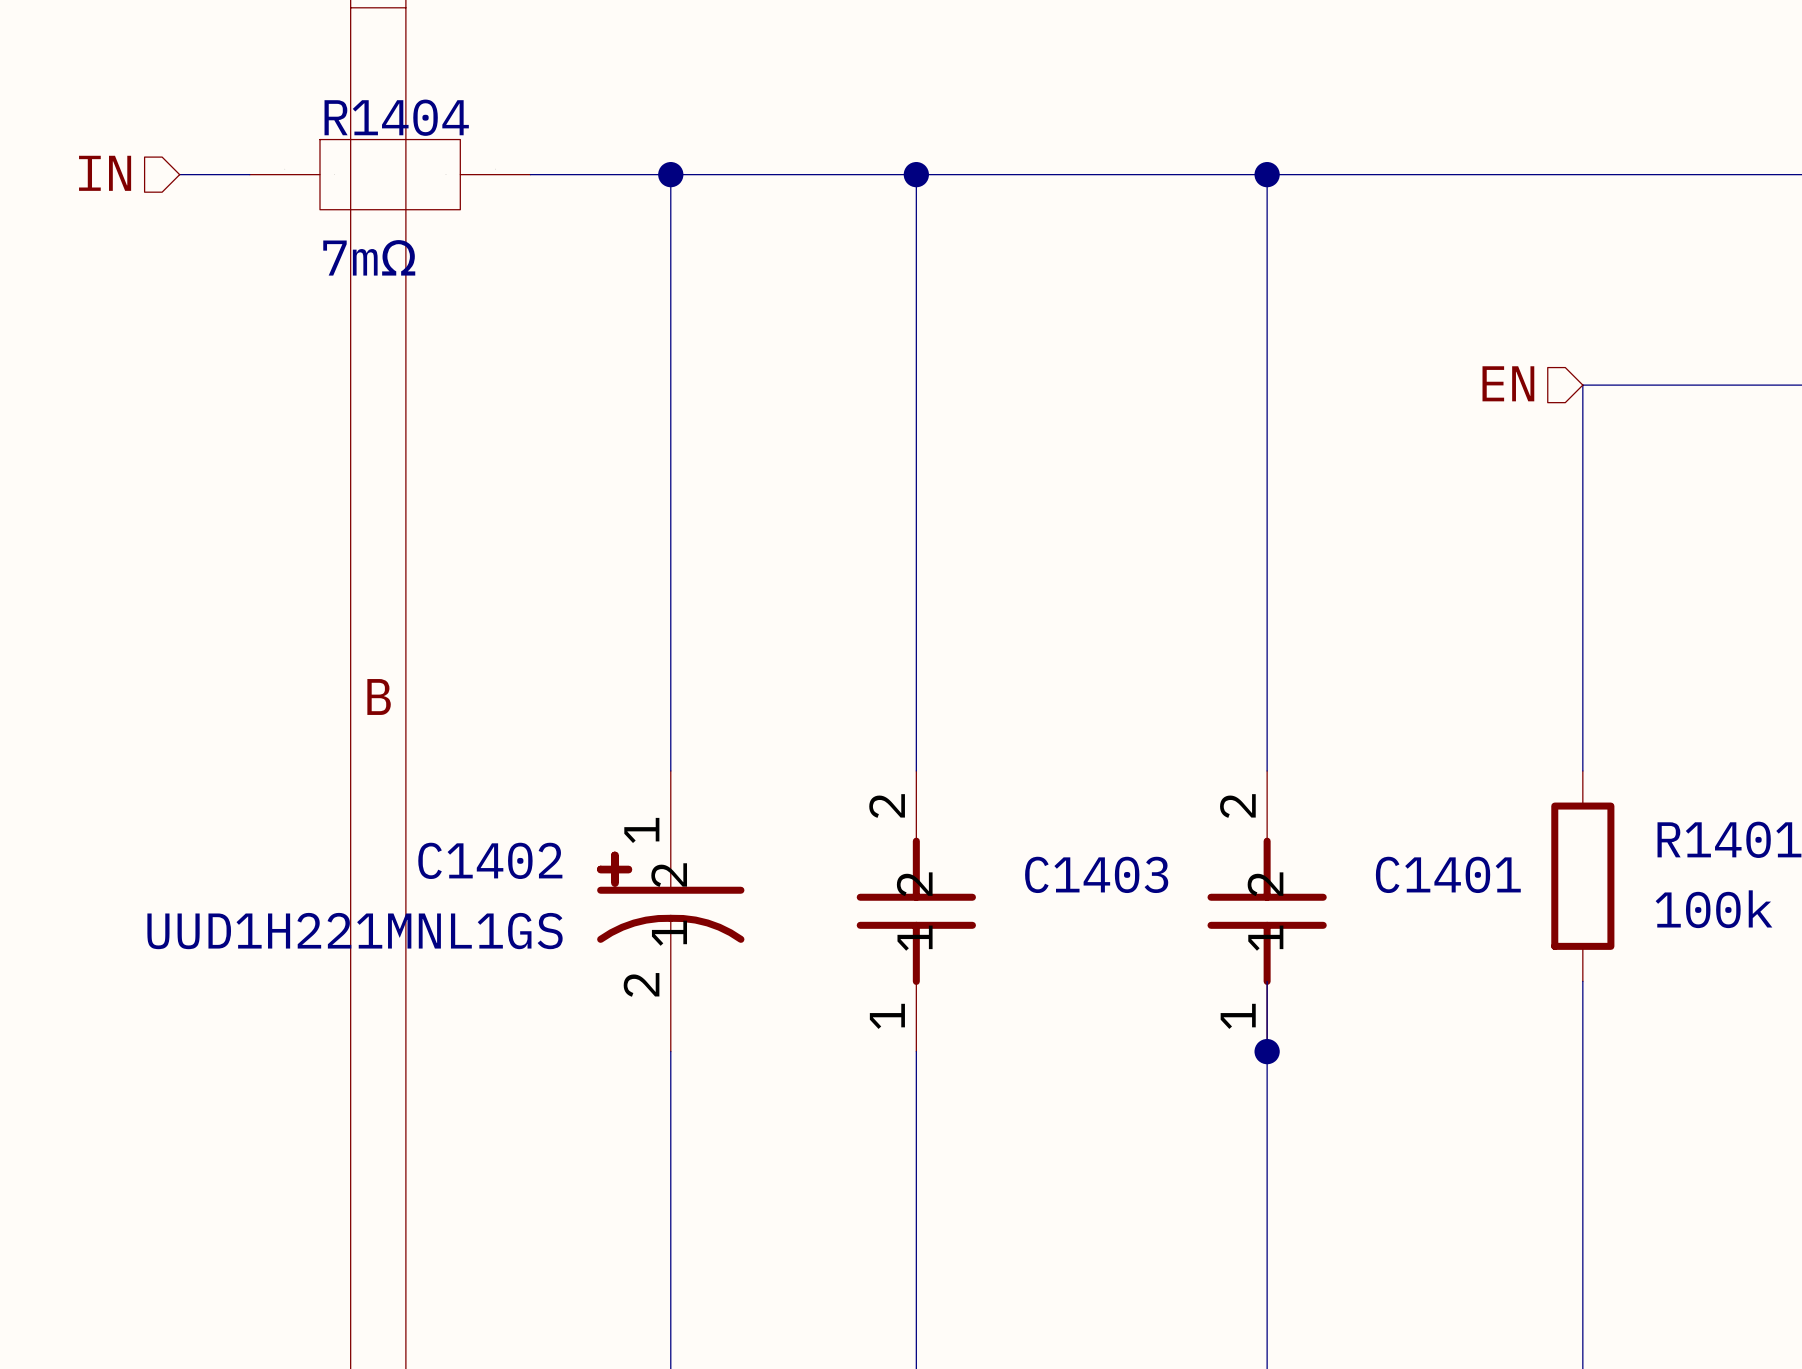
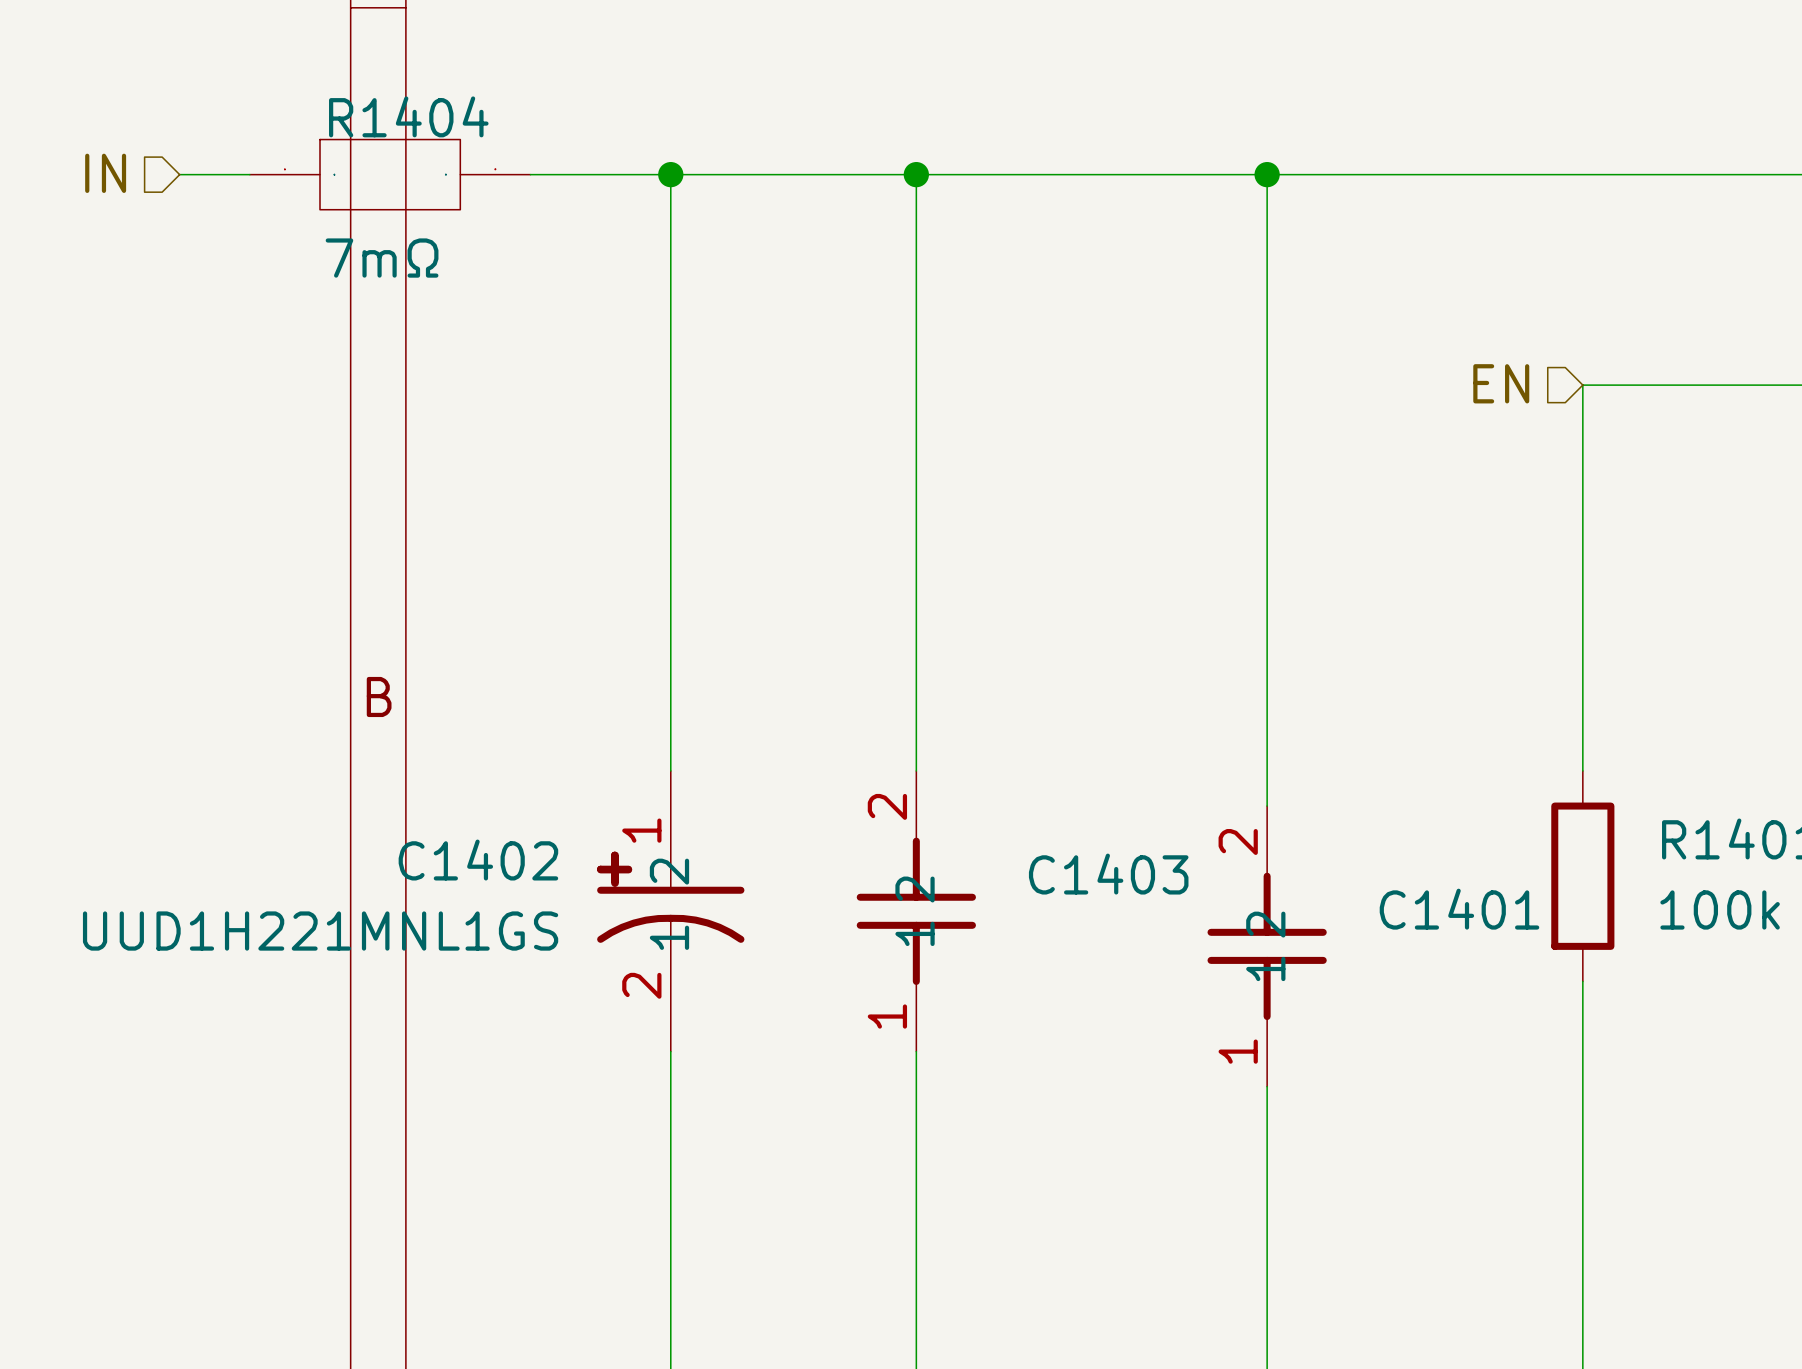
C1401 position: (1267, 911) -> (1267, 946)
junction: (1267, 1051) -> none

